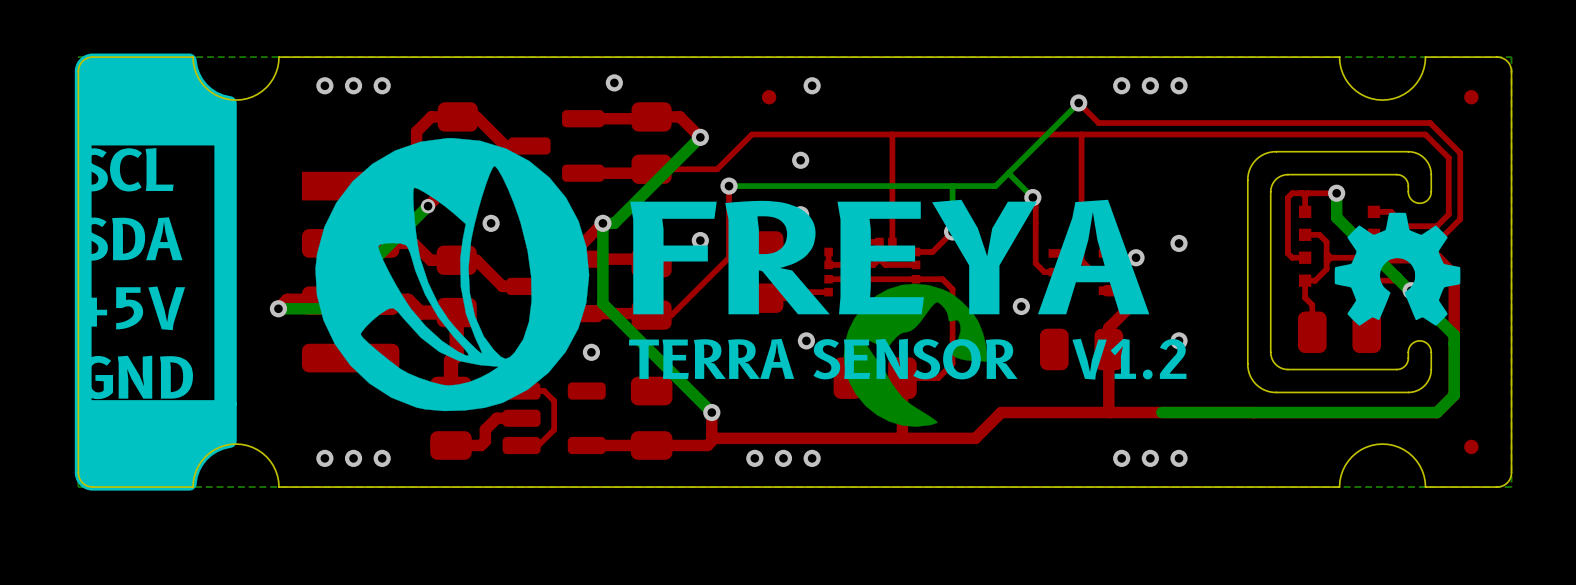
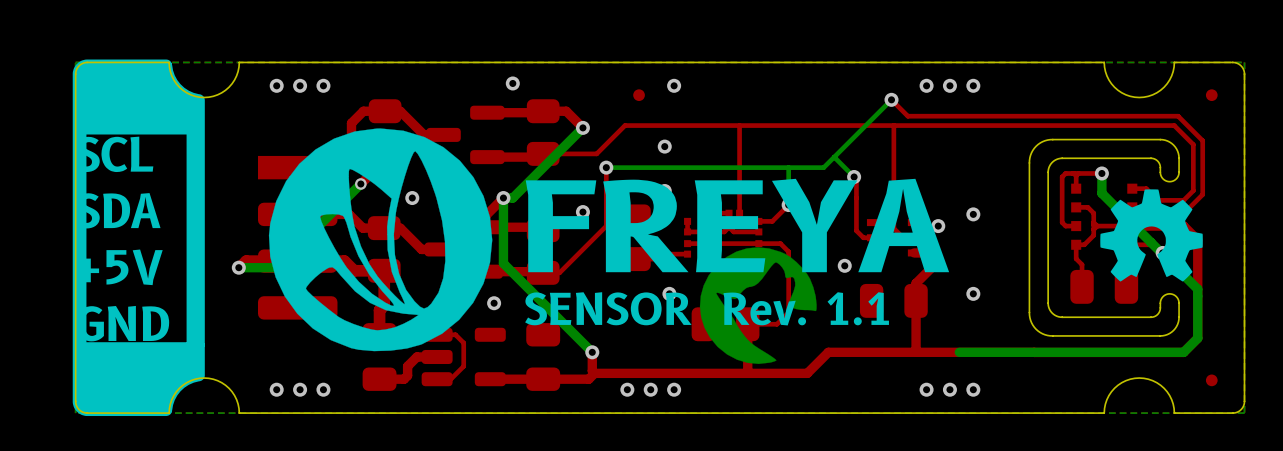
text: TERRA SENSOR V1.2 (907, 359) -> SENSOR Rev. 1.1 (707, 308)

